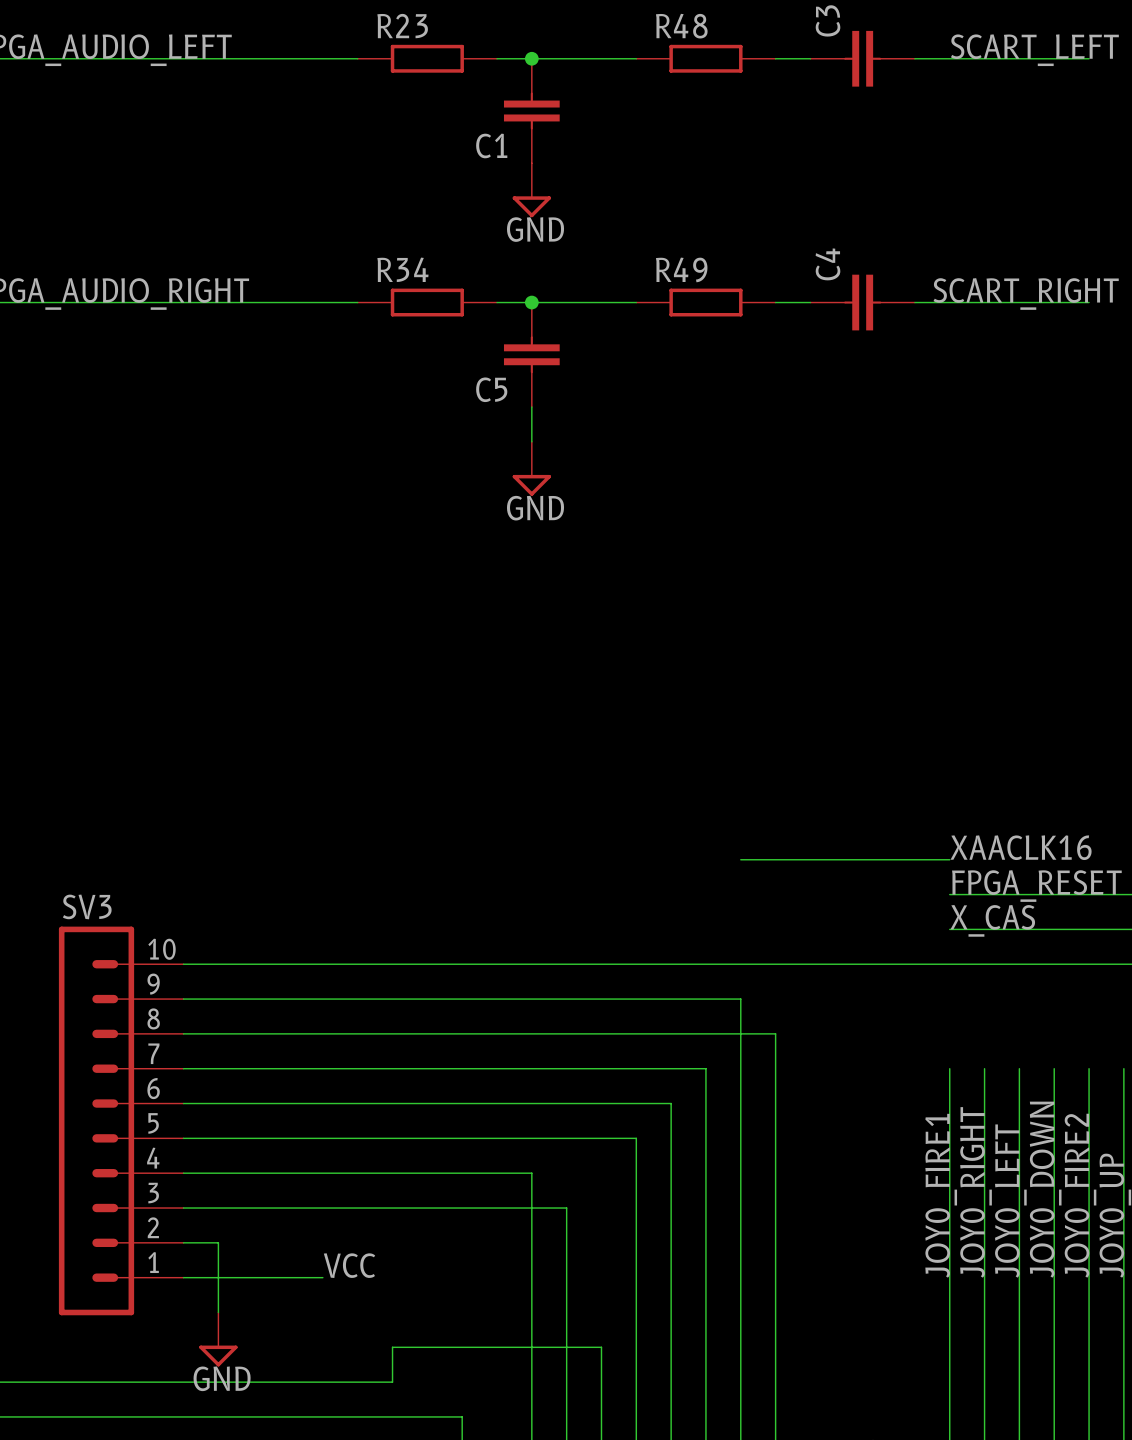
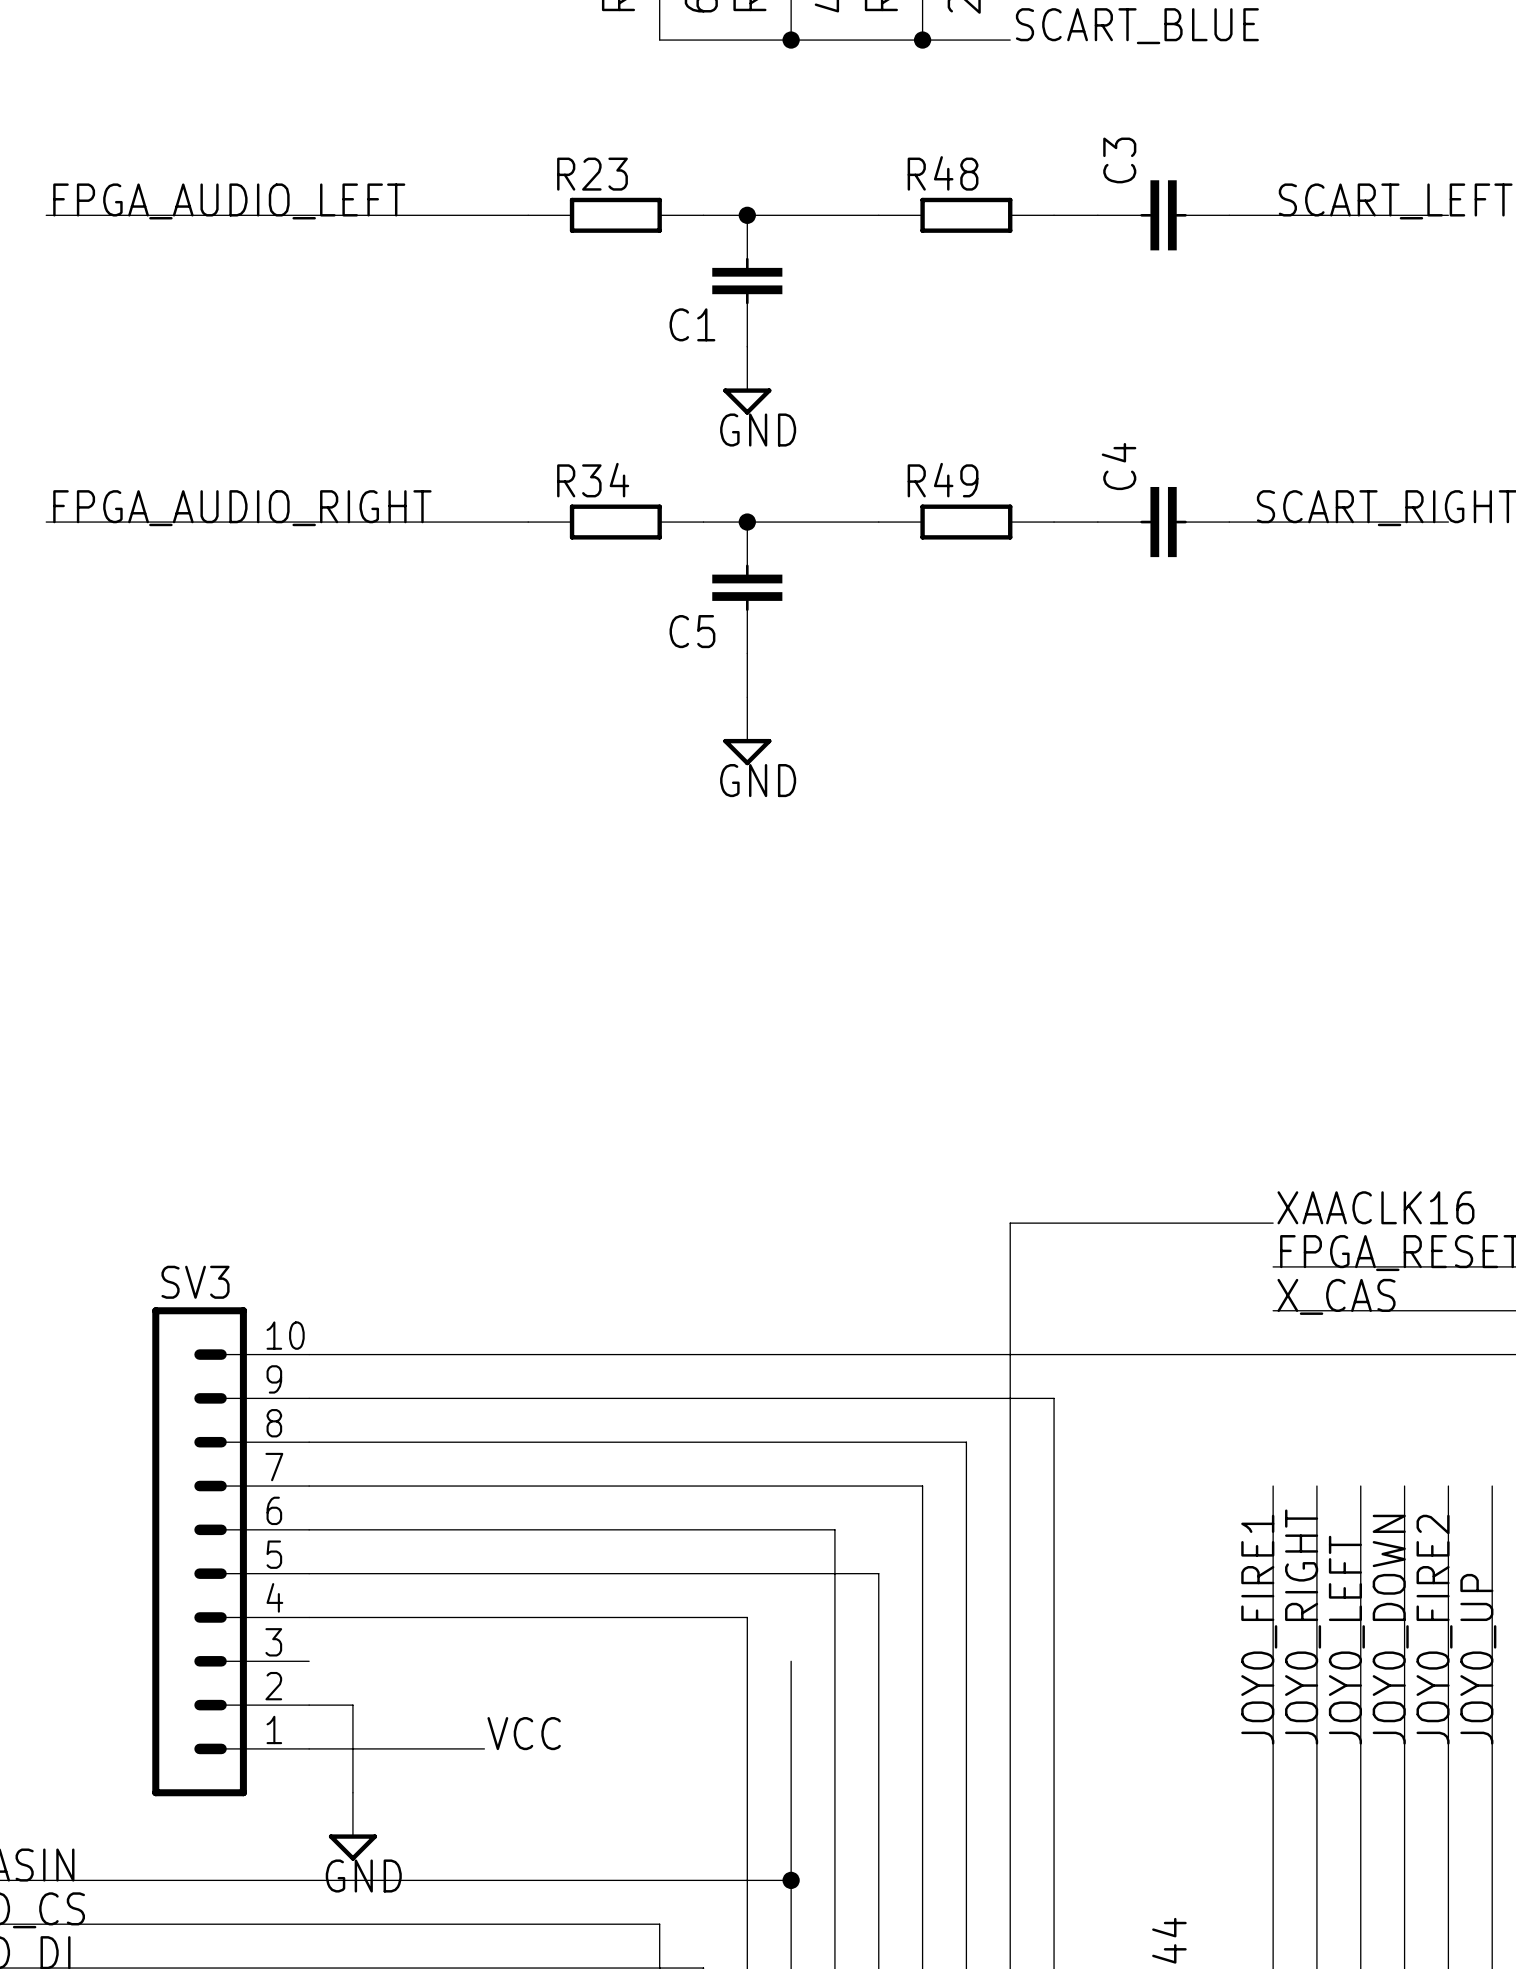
wire: (705, 1033) (775, 1033) -> (1010, 1223) (1010, 1398) (1054, 1398) (1054, 1442)
wire: (671, 1068) (705, 1068) -> (966, 1442) (966, 1486)
wire: (601, 1103) (671, 1103) -> (922, 1486) (922, 1529)
wire: none -> (834, 1529) (834, 1836)
wire: (183, 1208) (566, 1208) -> none
wire: (601, 1347) (392, 1347) (392, 1382) -> (791, 1880) (572, 1880)
junction: none -> (791, 1880)

